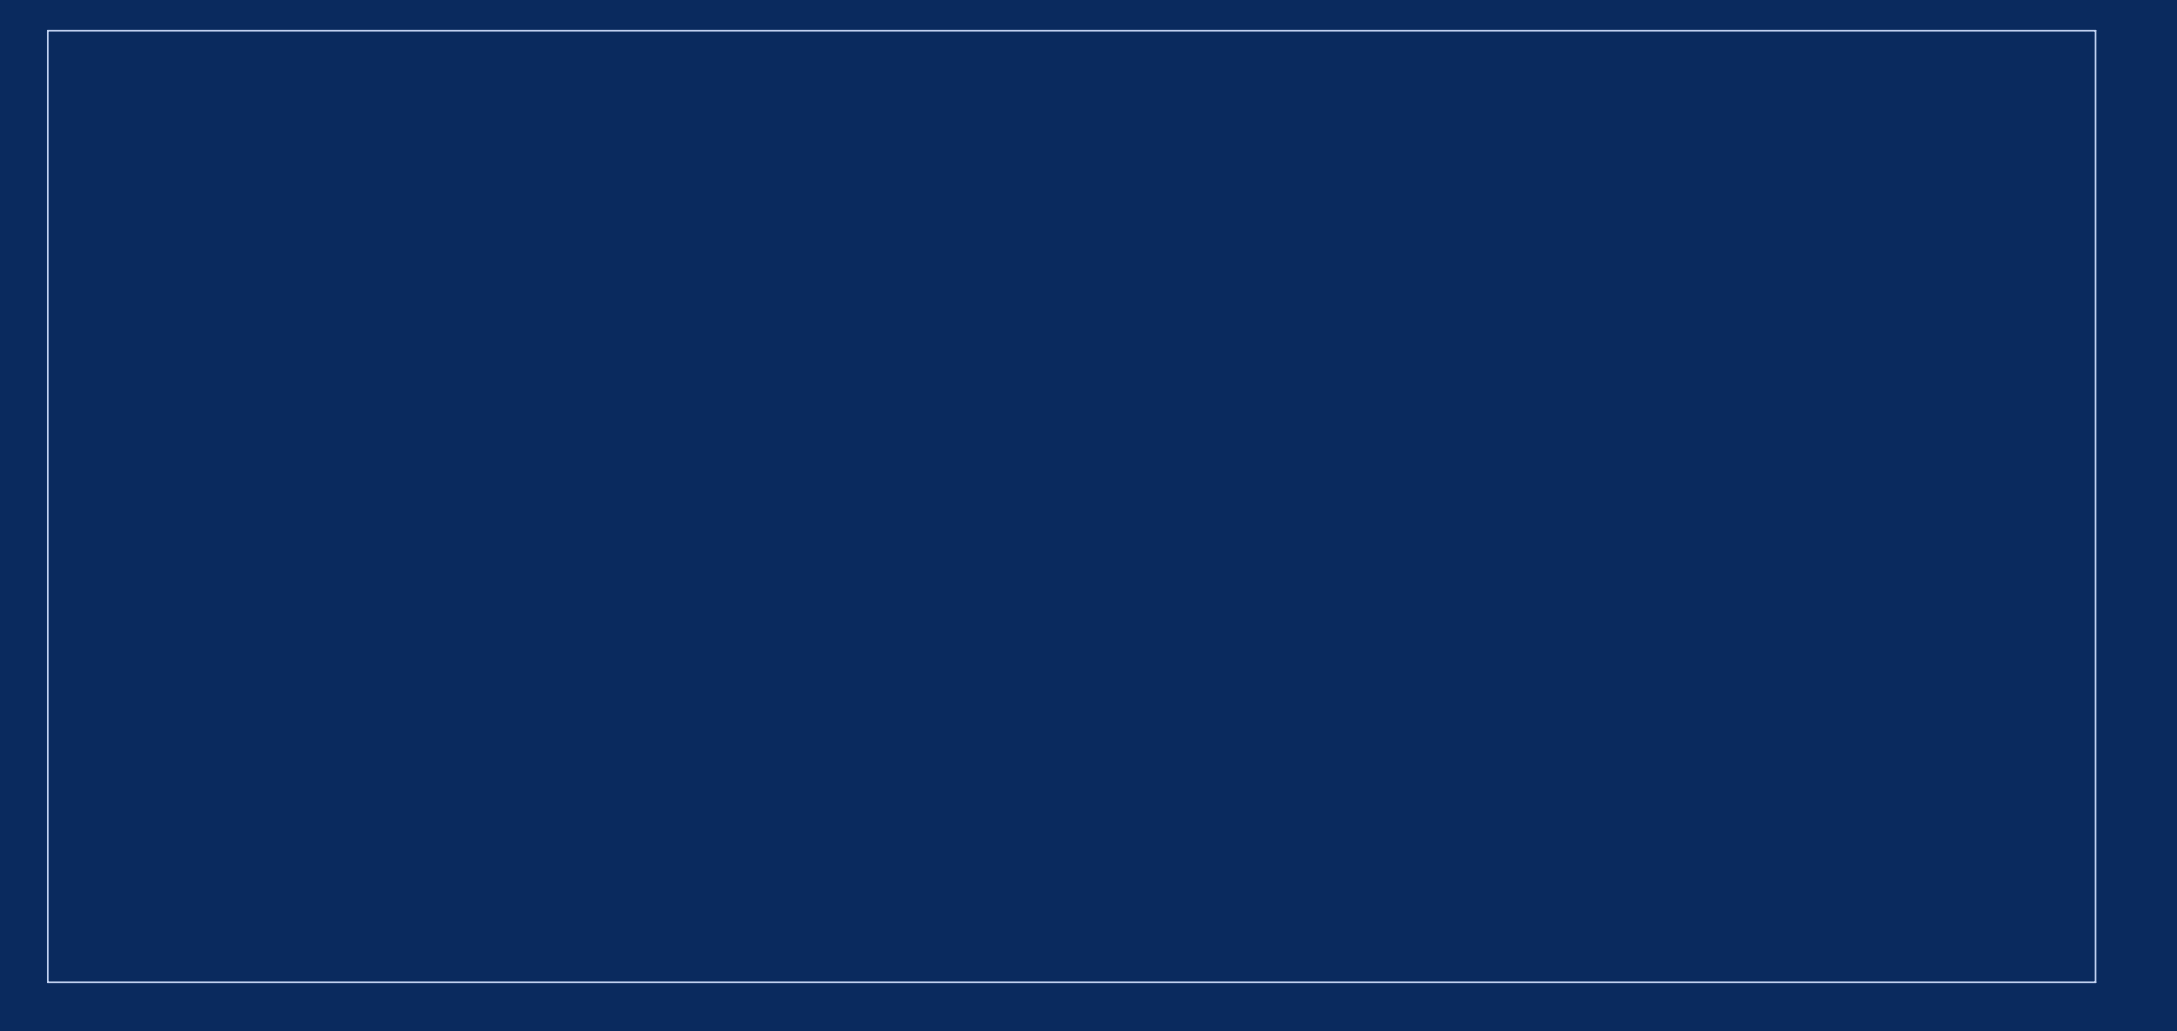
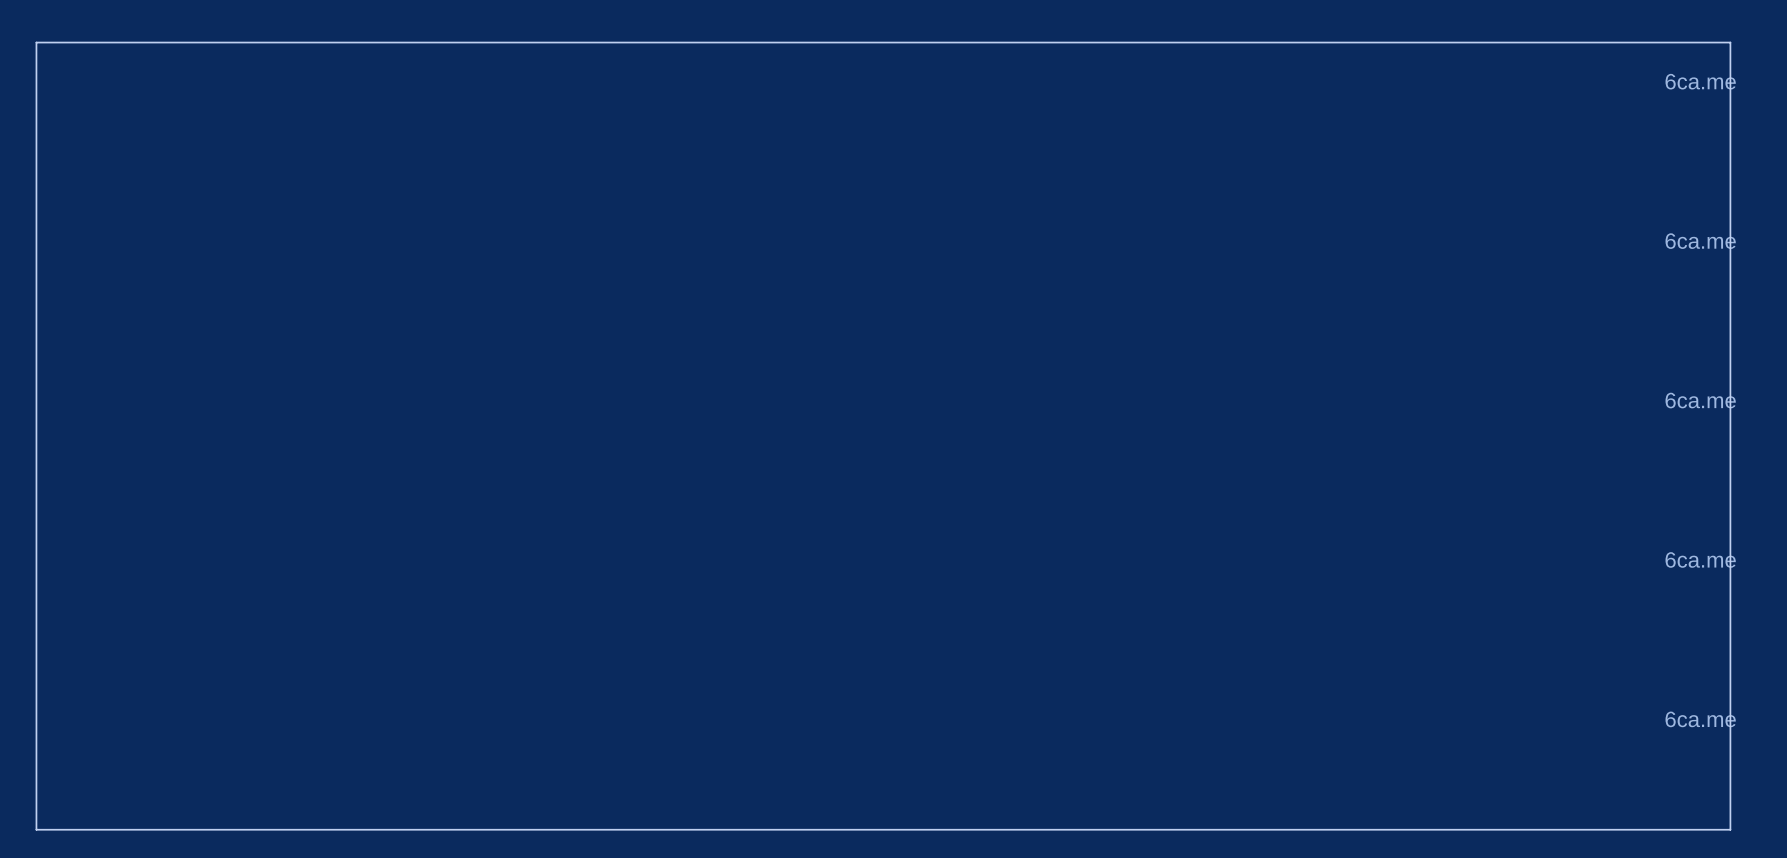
drawing: none -> [1665, 73, 1736, 90]
drawing: none -> [1665, 233, 1736, 249]
drawing: none -> [1665, 392, 1736, 409]
drawing: none -> [1665, 552, 1736, 568]
drawing: none -> [1665, 711, 1736, 728]

